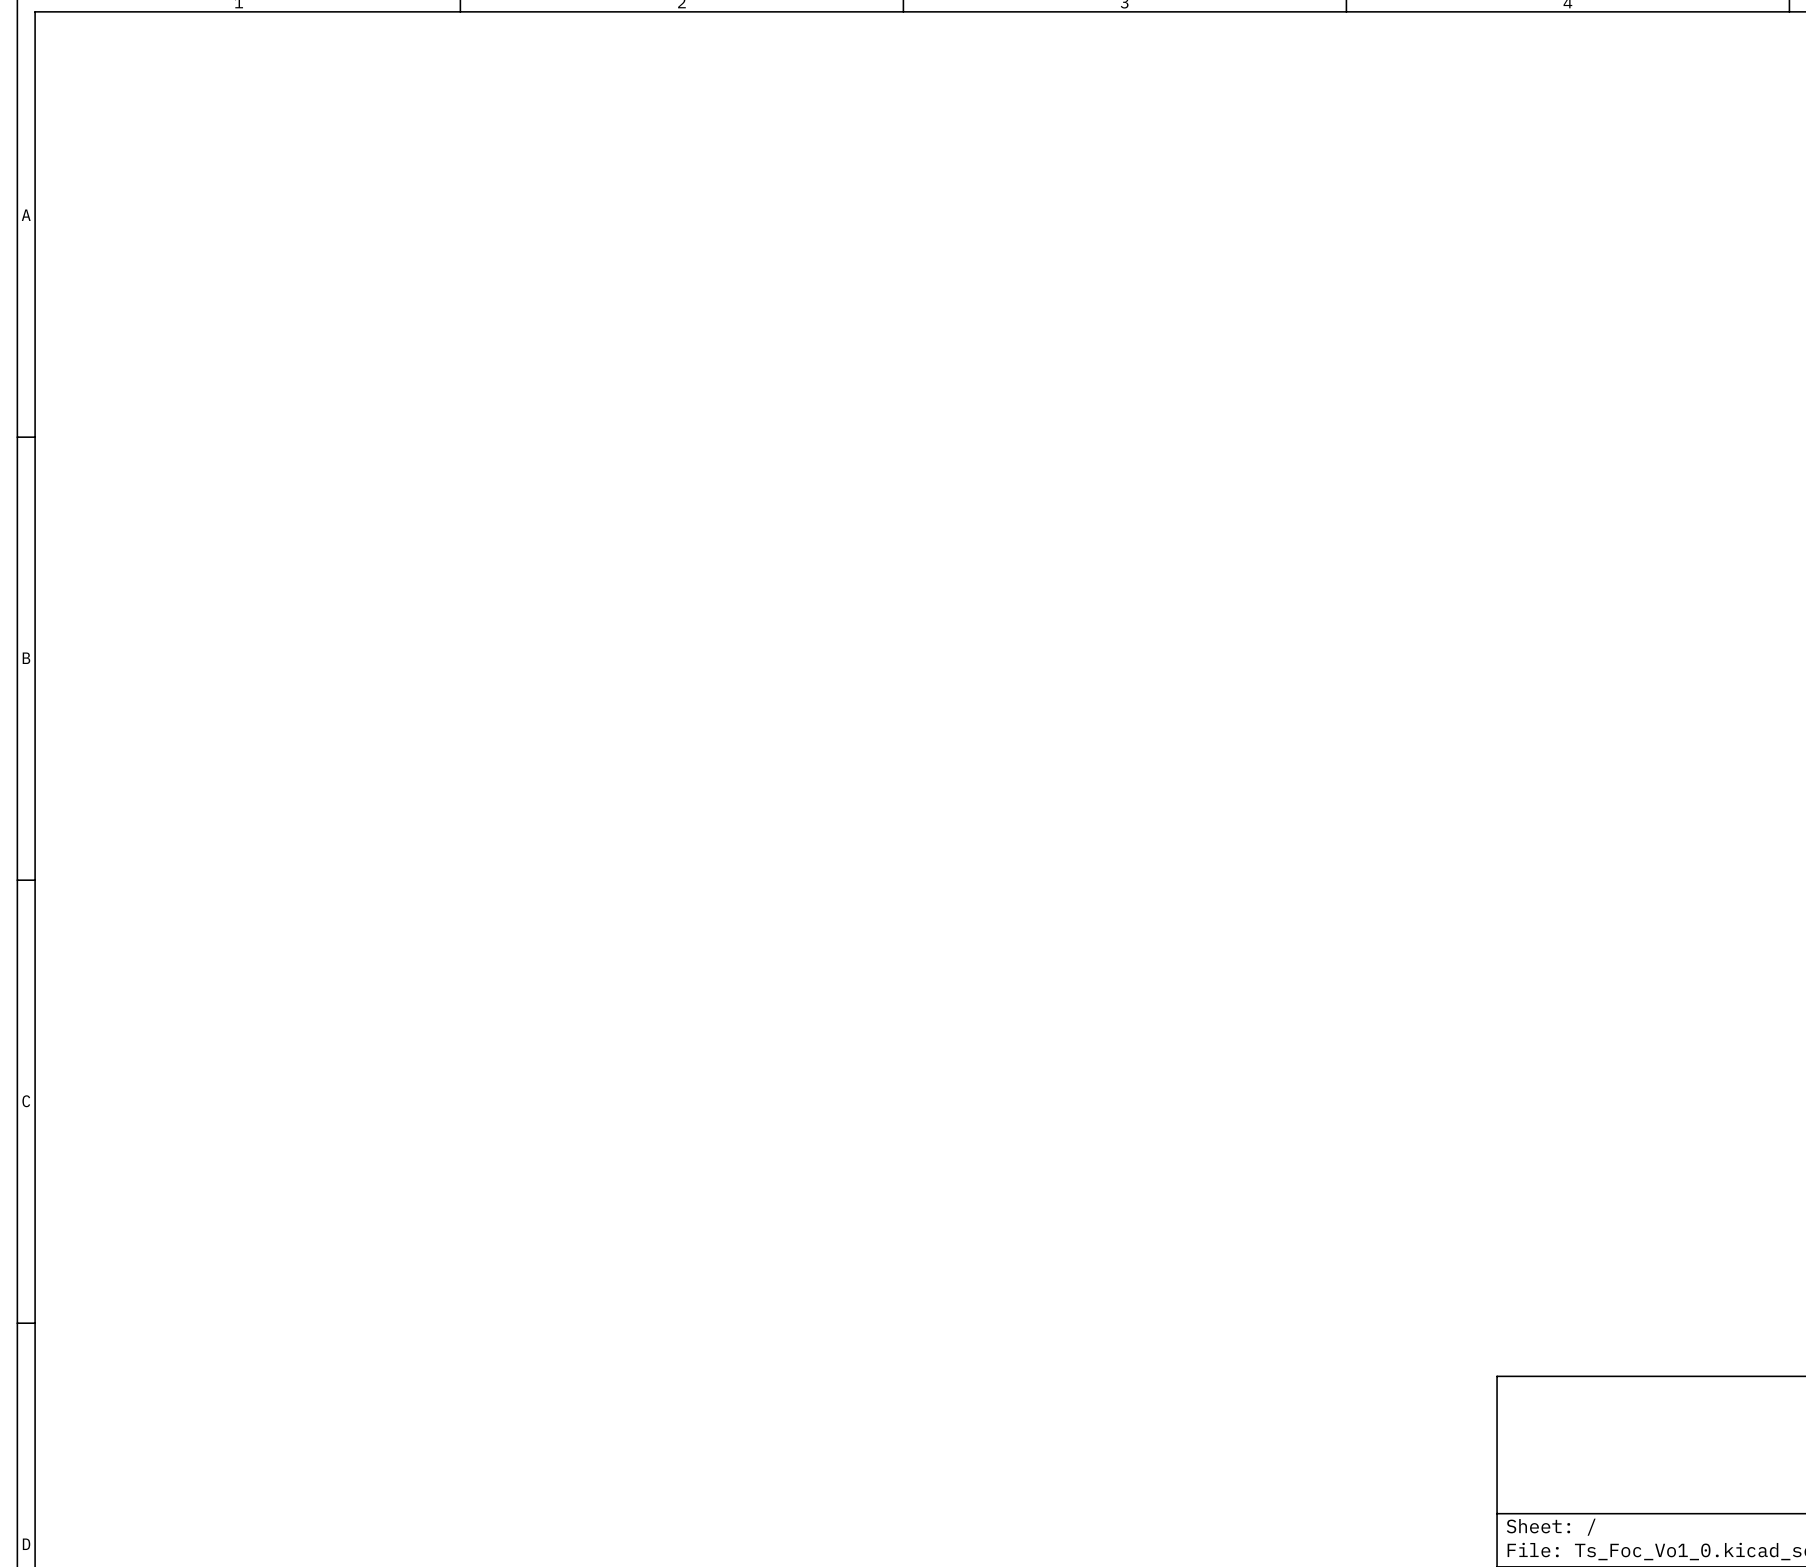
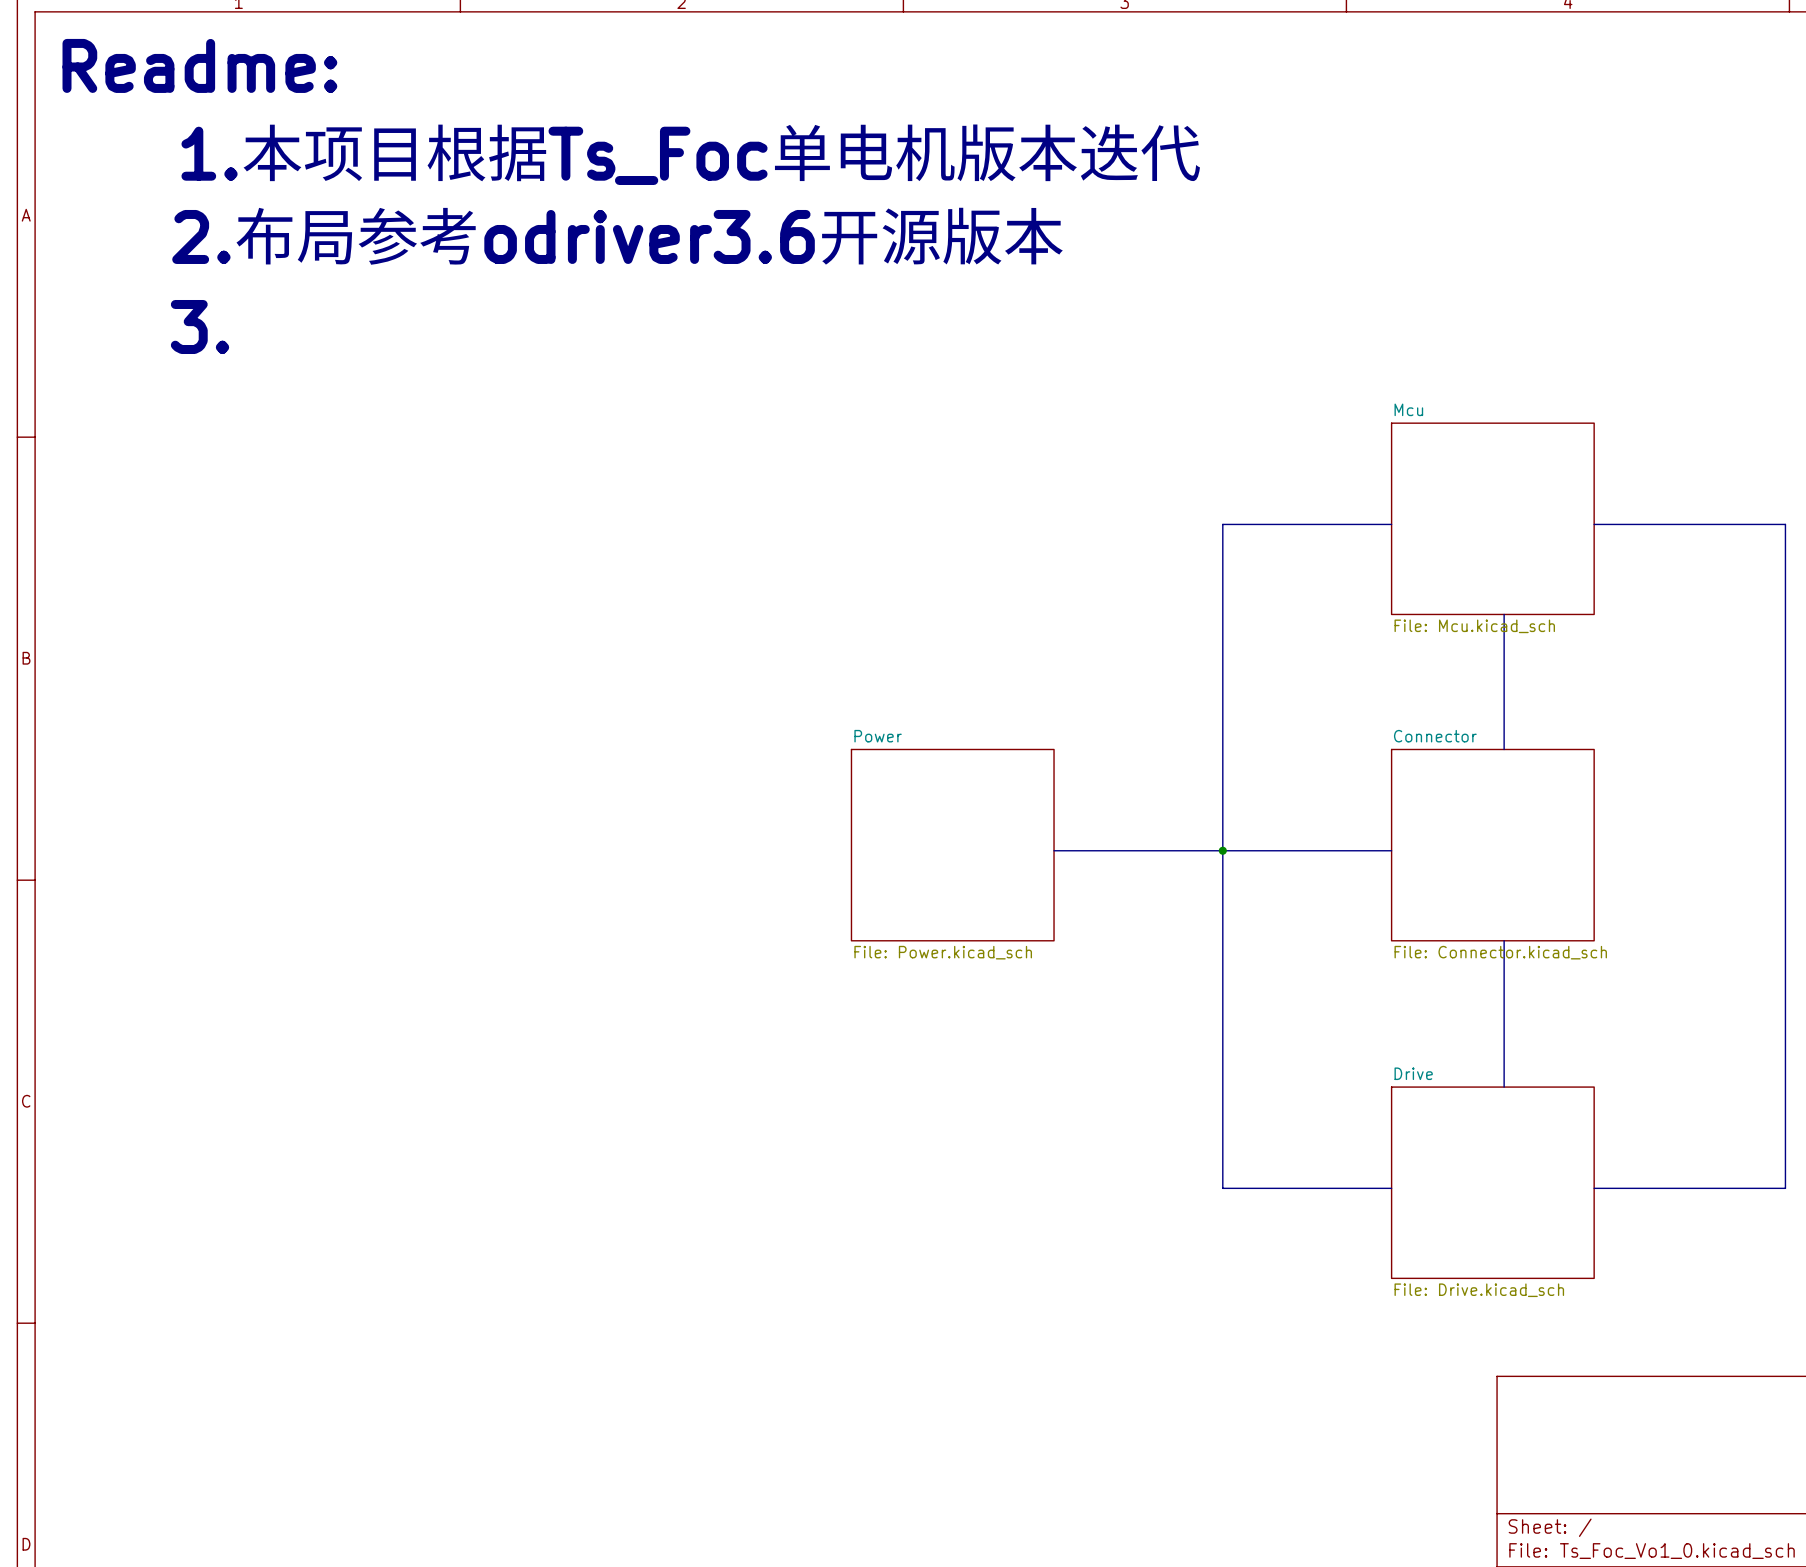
text: none -> Readme: (199, 65)
text: none -> 1.本项目根据Ts_Foc单电机版本迭代 (692, 152)
text: none -> 2.布局参考odriver3.6开源版本 (619, 236)
text: none -> 3. (200, 326)
sheet Mcu: none -> File: Mcu.kicad_sch (1492, 518)
bus: none -> (1391, 524) (1222, 524) (1222, 1188) (1391, 1188)
bus: none -> (1594, 524) (1785, 524) (1785, 1188) (1594, 1188)
bus: none -> (1504, 614) (1504, 749)
sheet Power: none -> File: Power.kicad_sch (952, 845)
sheet Connector: none -> File: Connector.kicad_sch (1492, 845)
bus: none -> (1054, 850) (1391, 850)
junction: none -> (1222, 850)
bus: none -> (1504, 940) (1504, 1087)
sheet Drive: none -> File: Drive.kicad_sch (1492, 1182)

